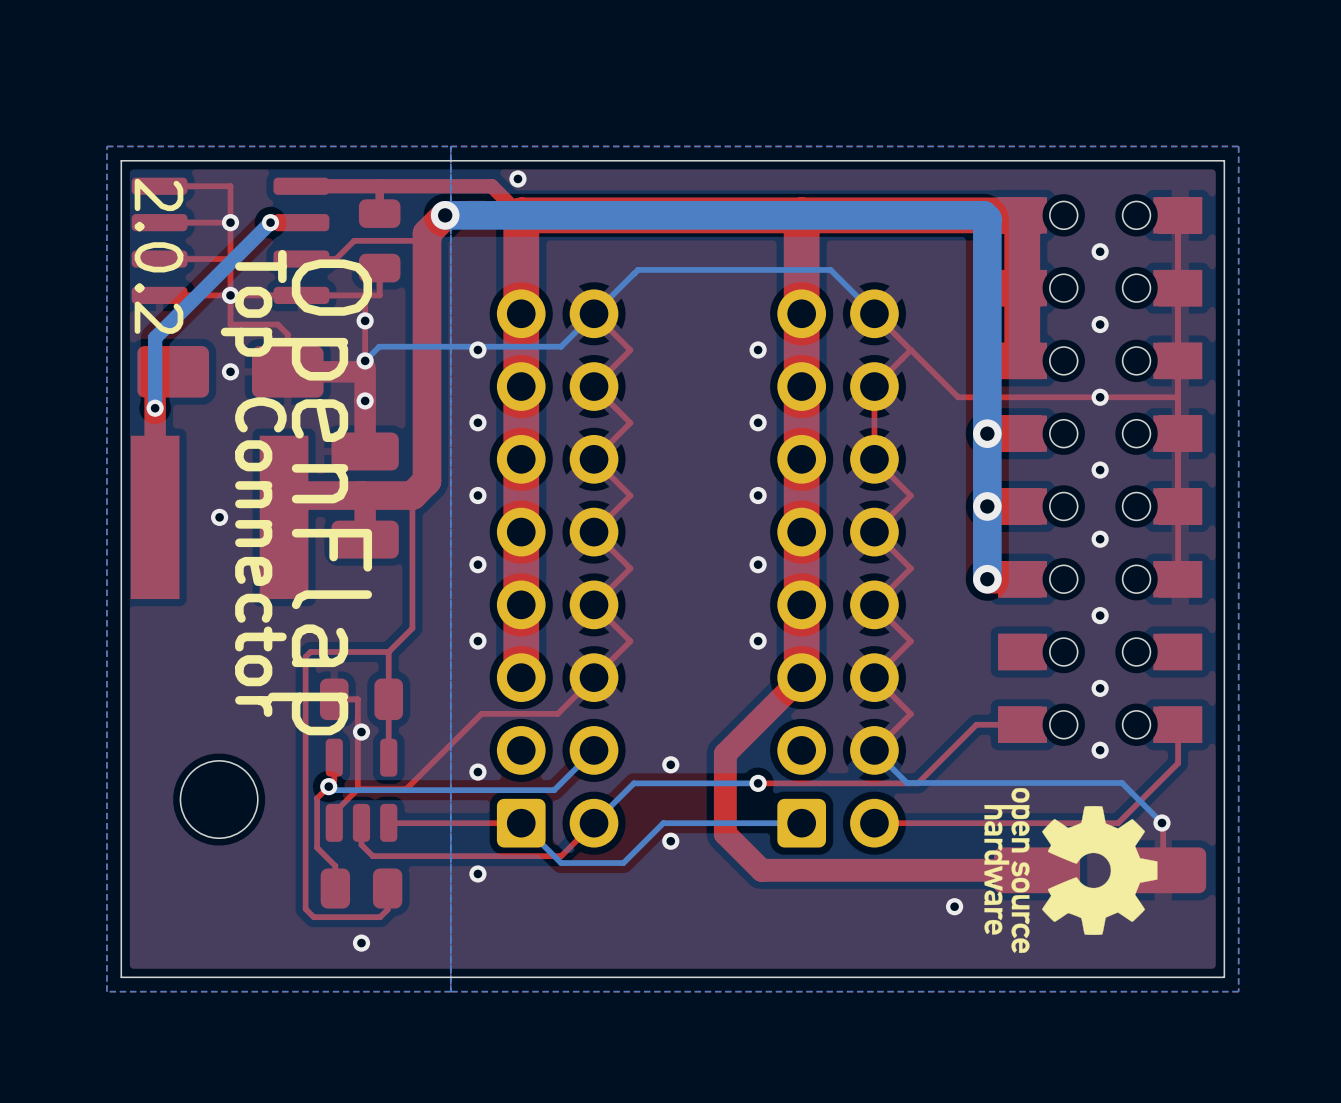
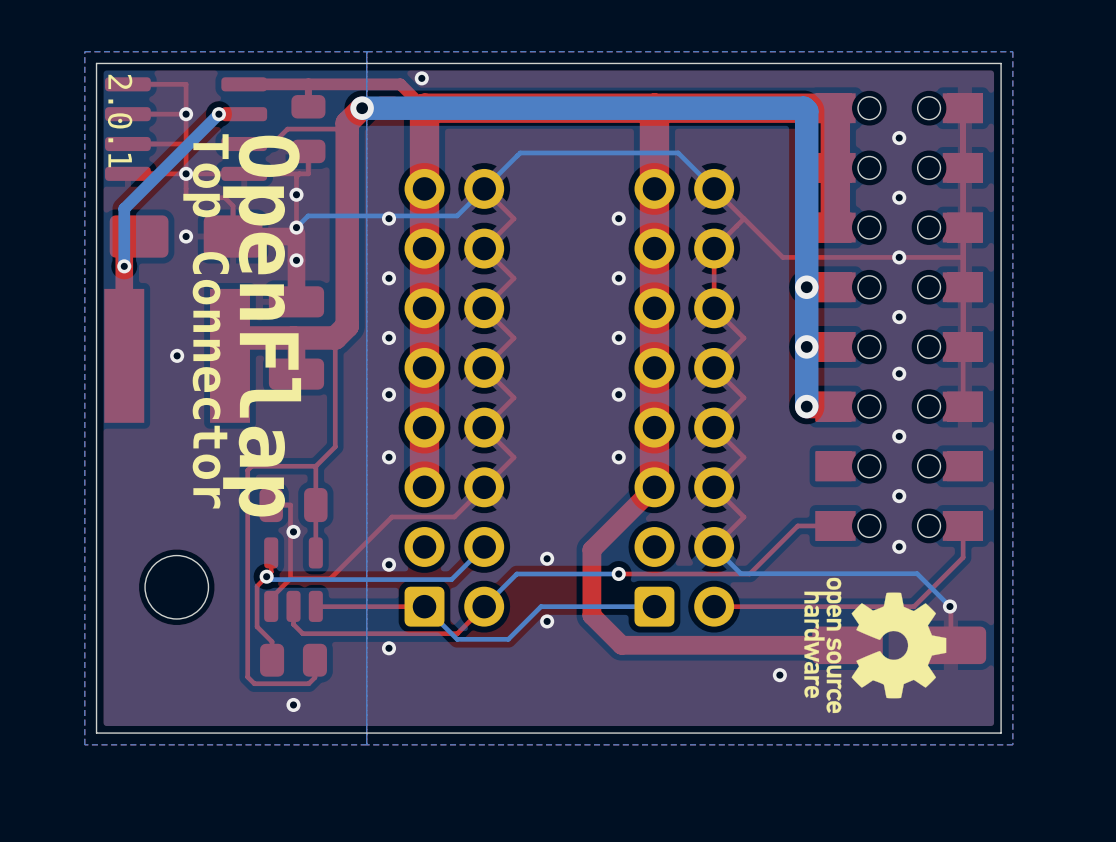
text: 2.0.2 (159, 256) -> 2.0.1 (120, 121)

